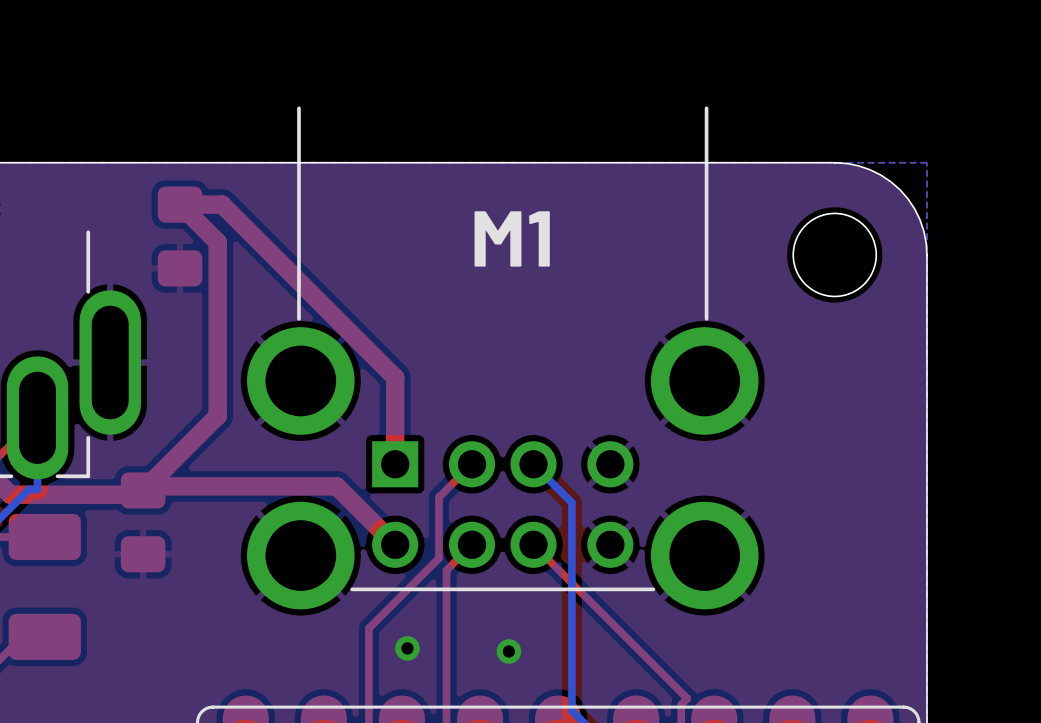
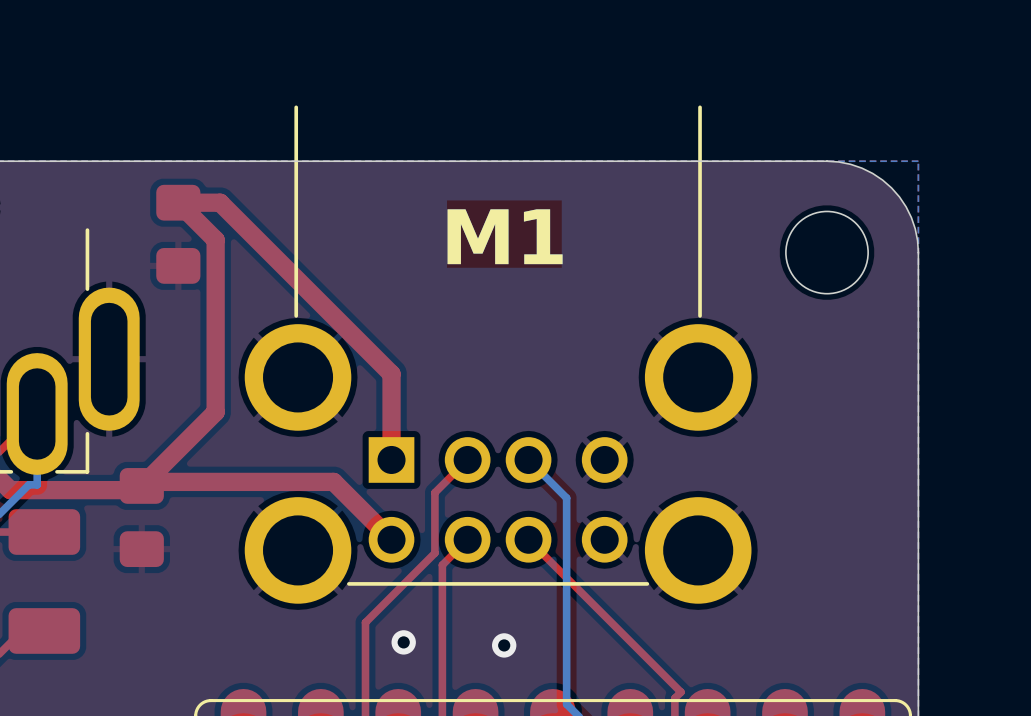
text: none -> M1 (505, 236)
text: M1 (512, 238) -> none

